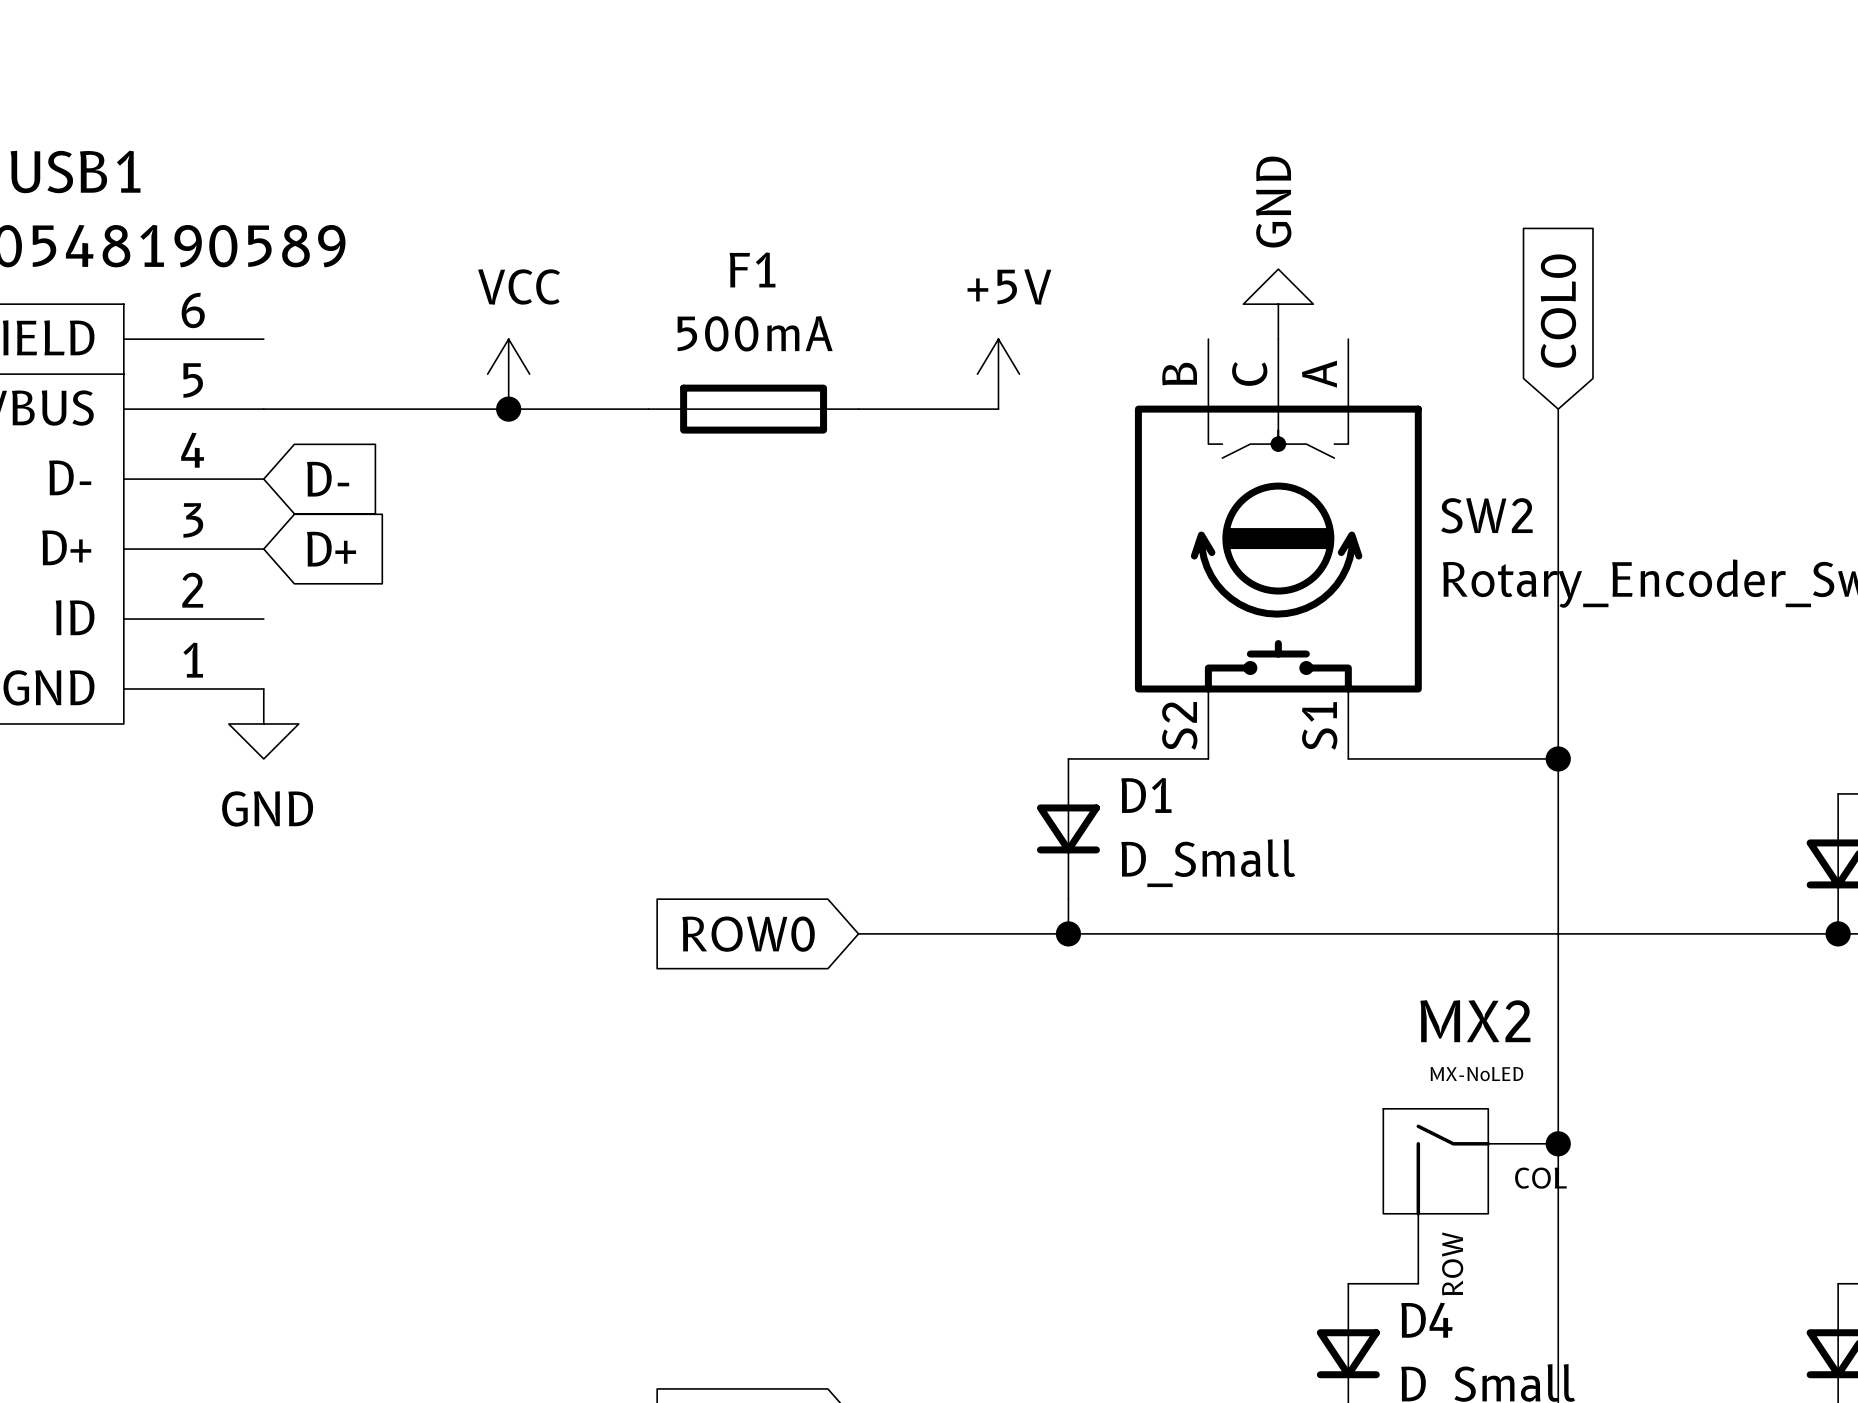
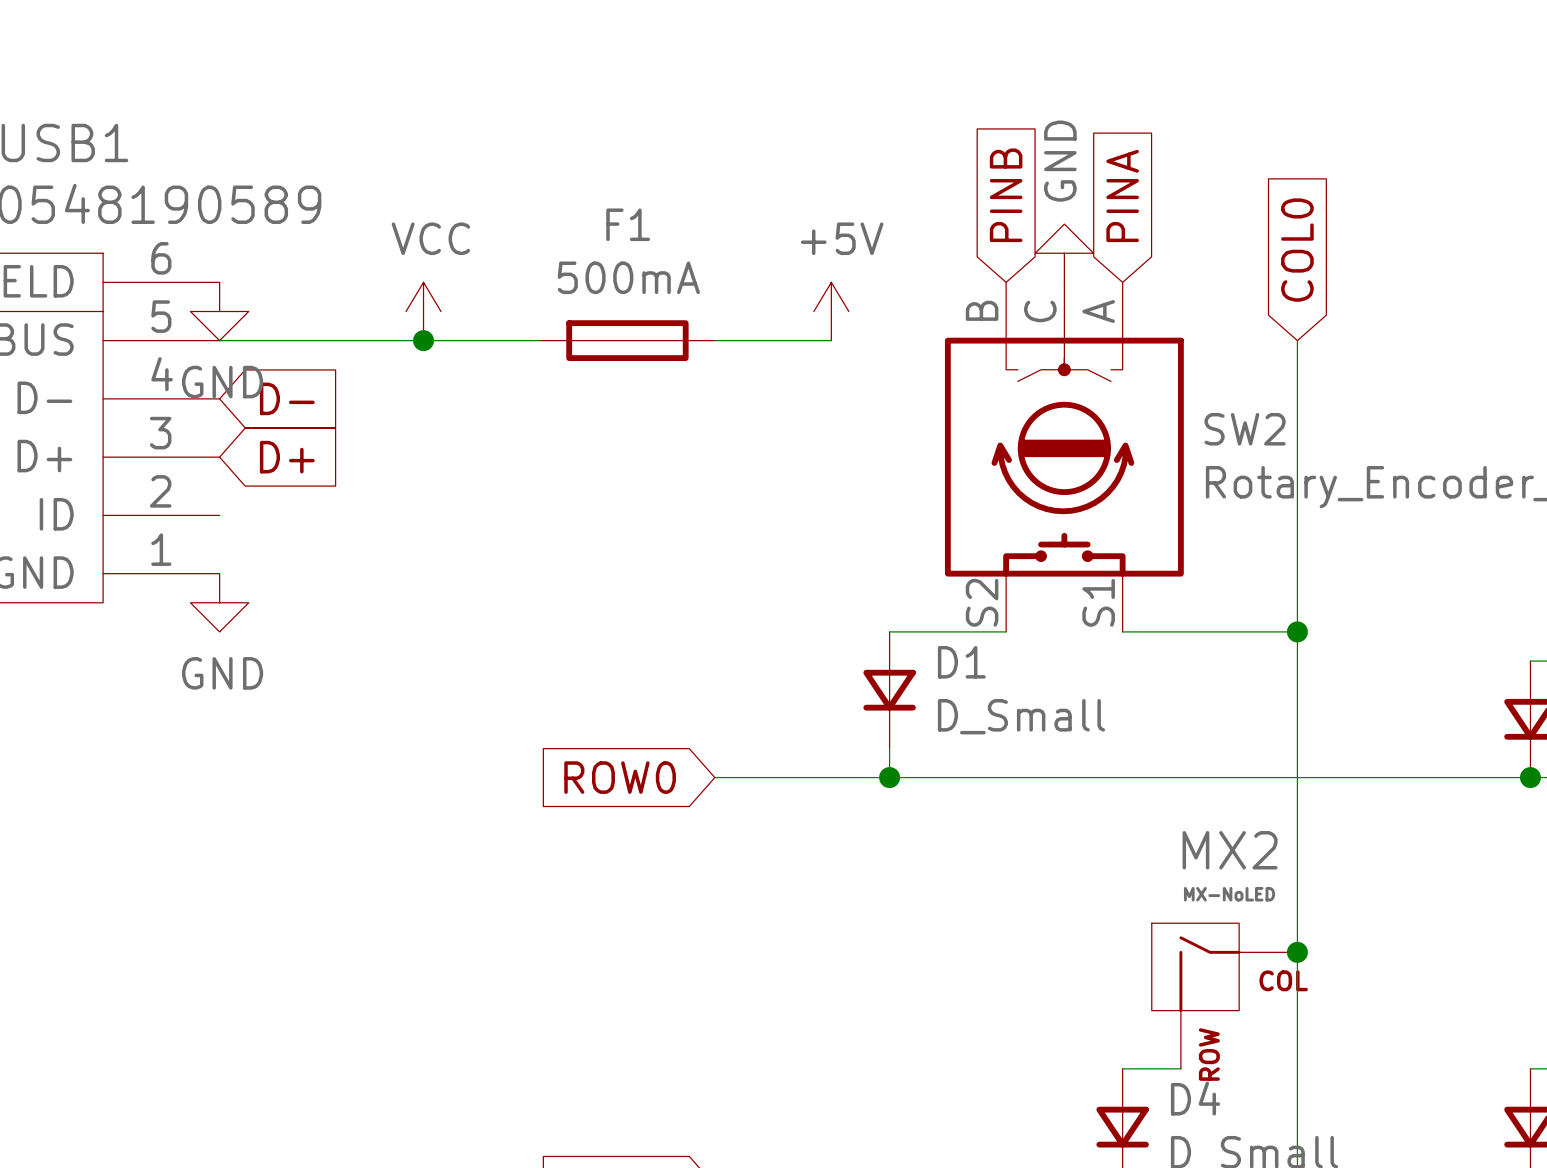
global label: none -> PINA (1122, 195)
global label: none -> PINB (1006, 195)
power symbol: none -> GND (219, 311)

